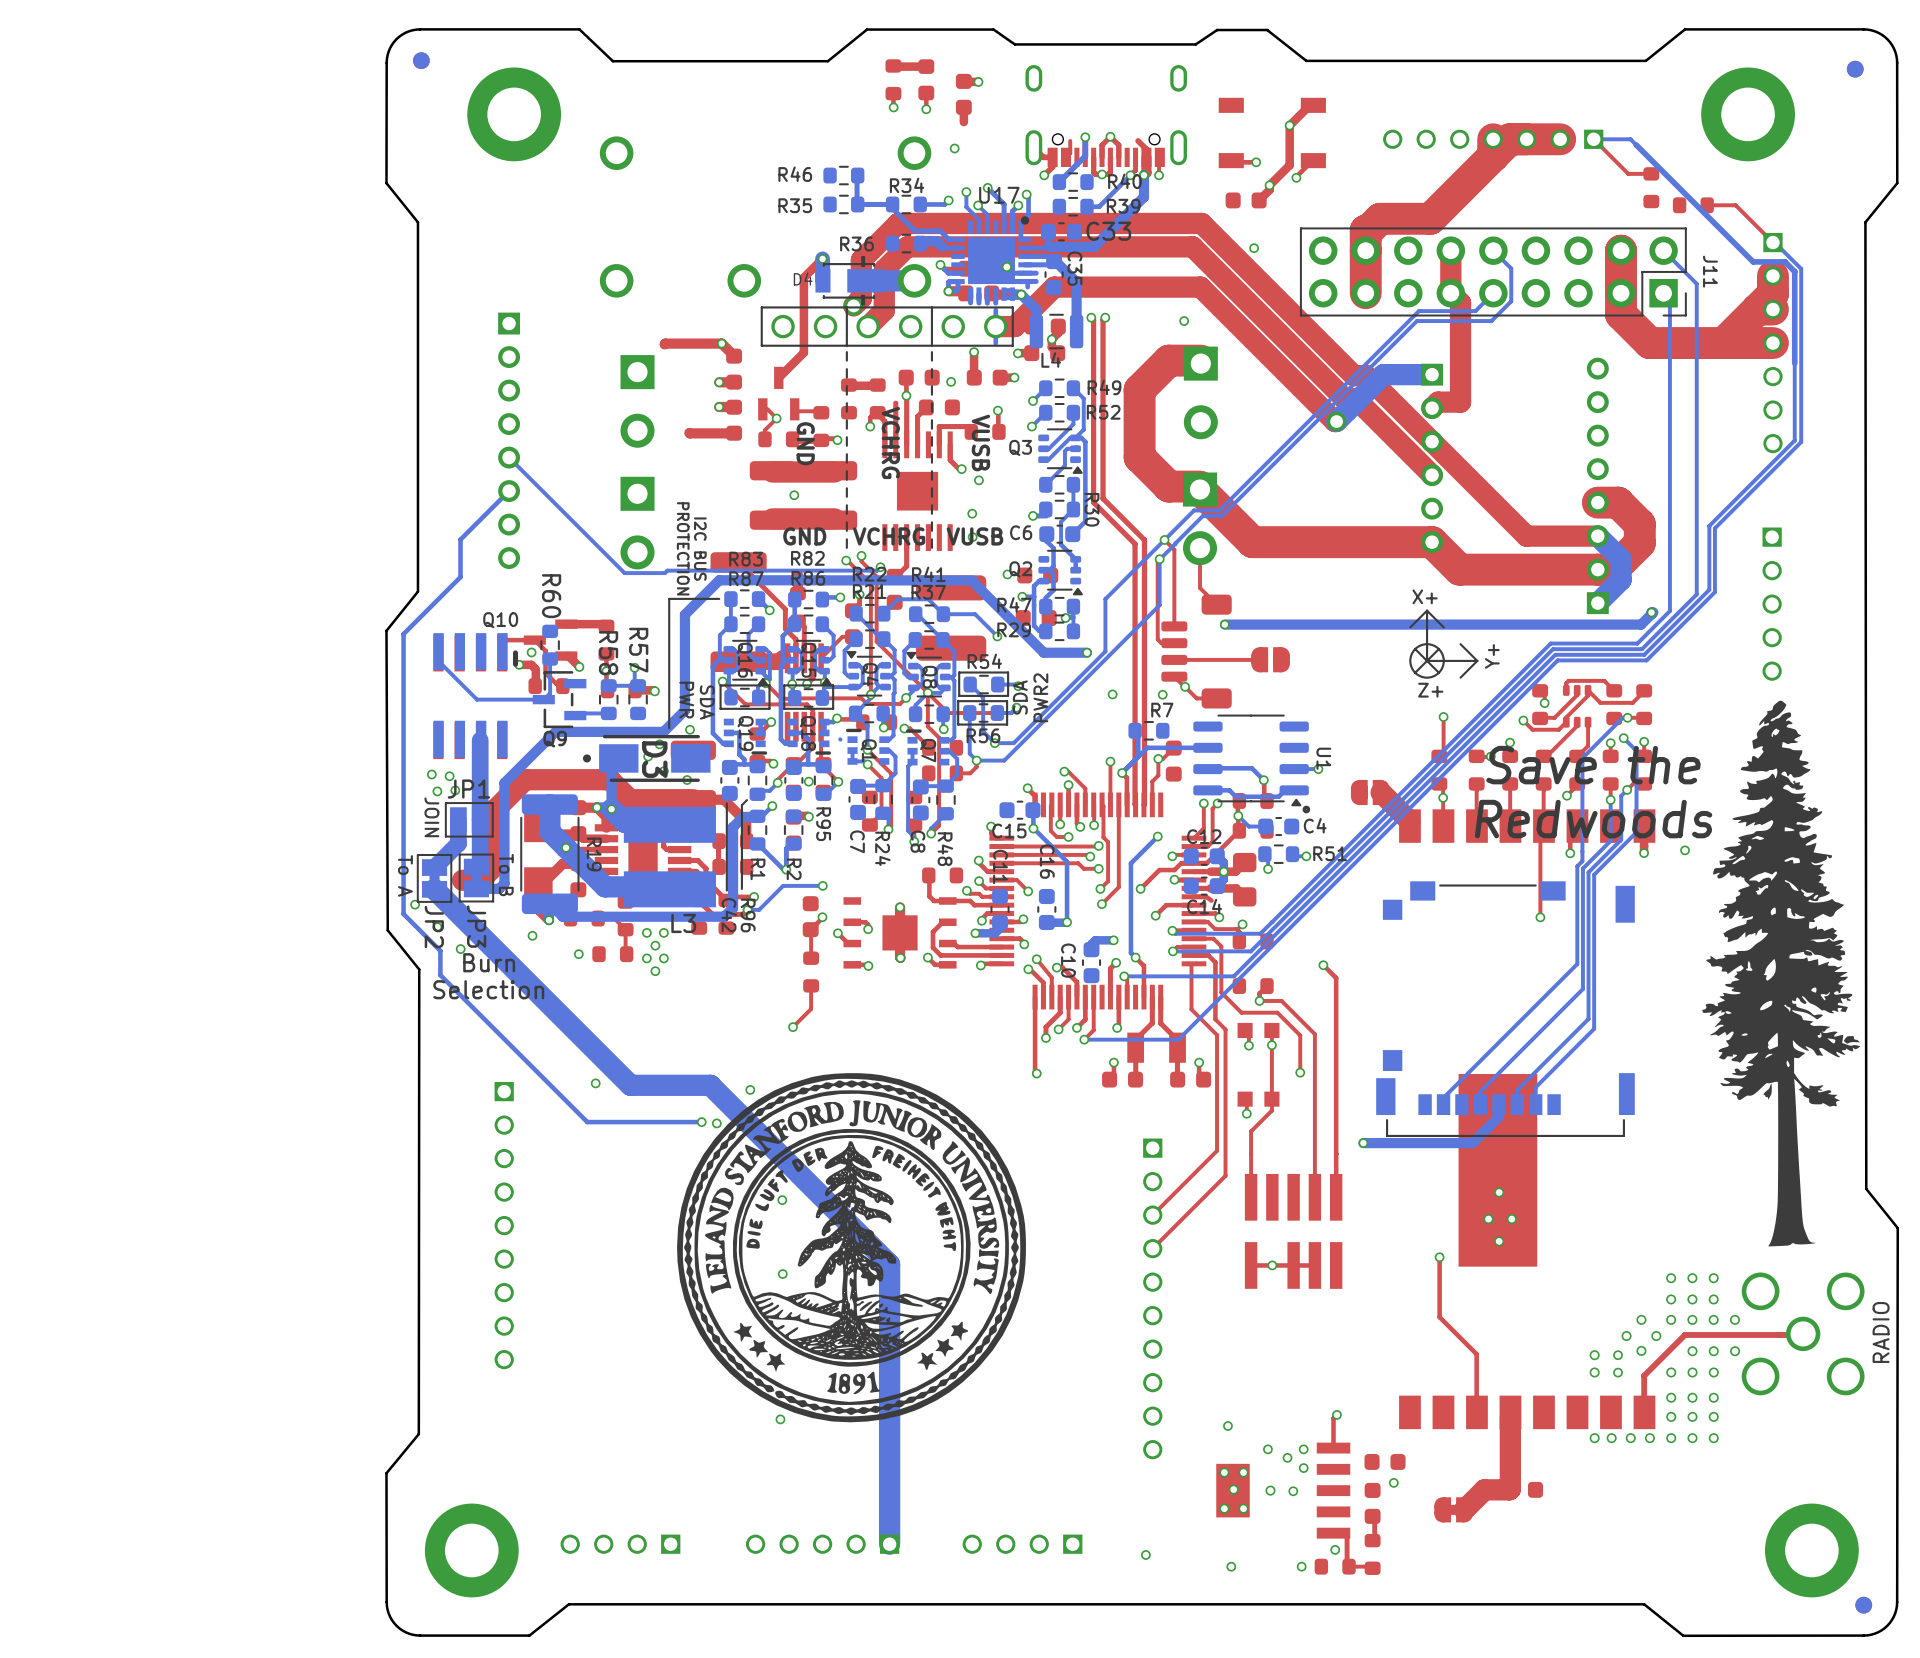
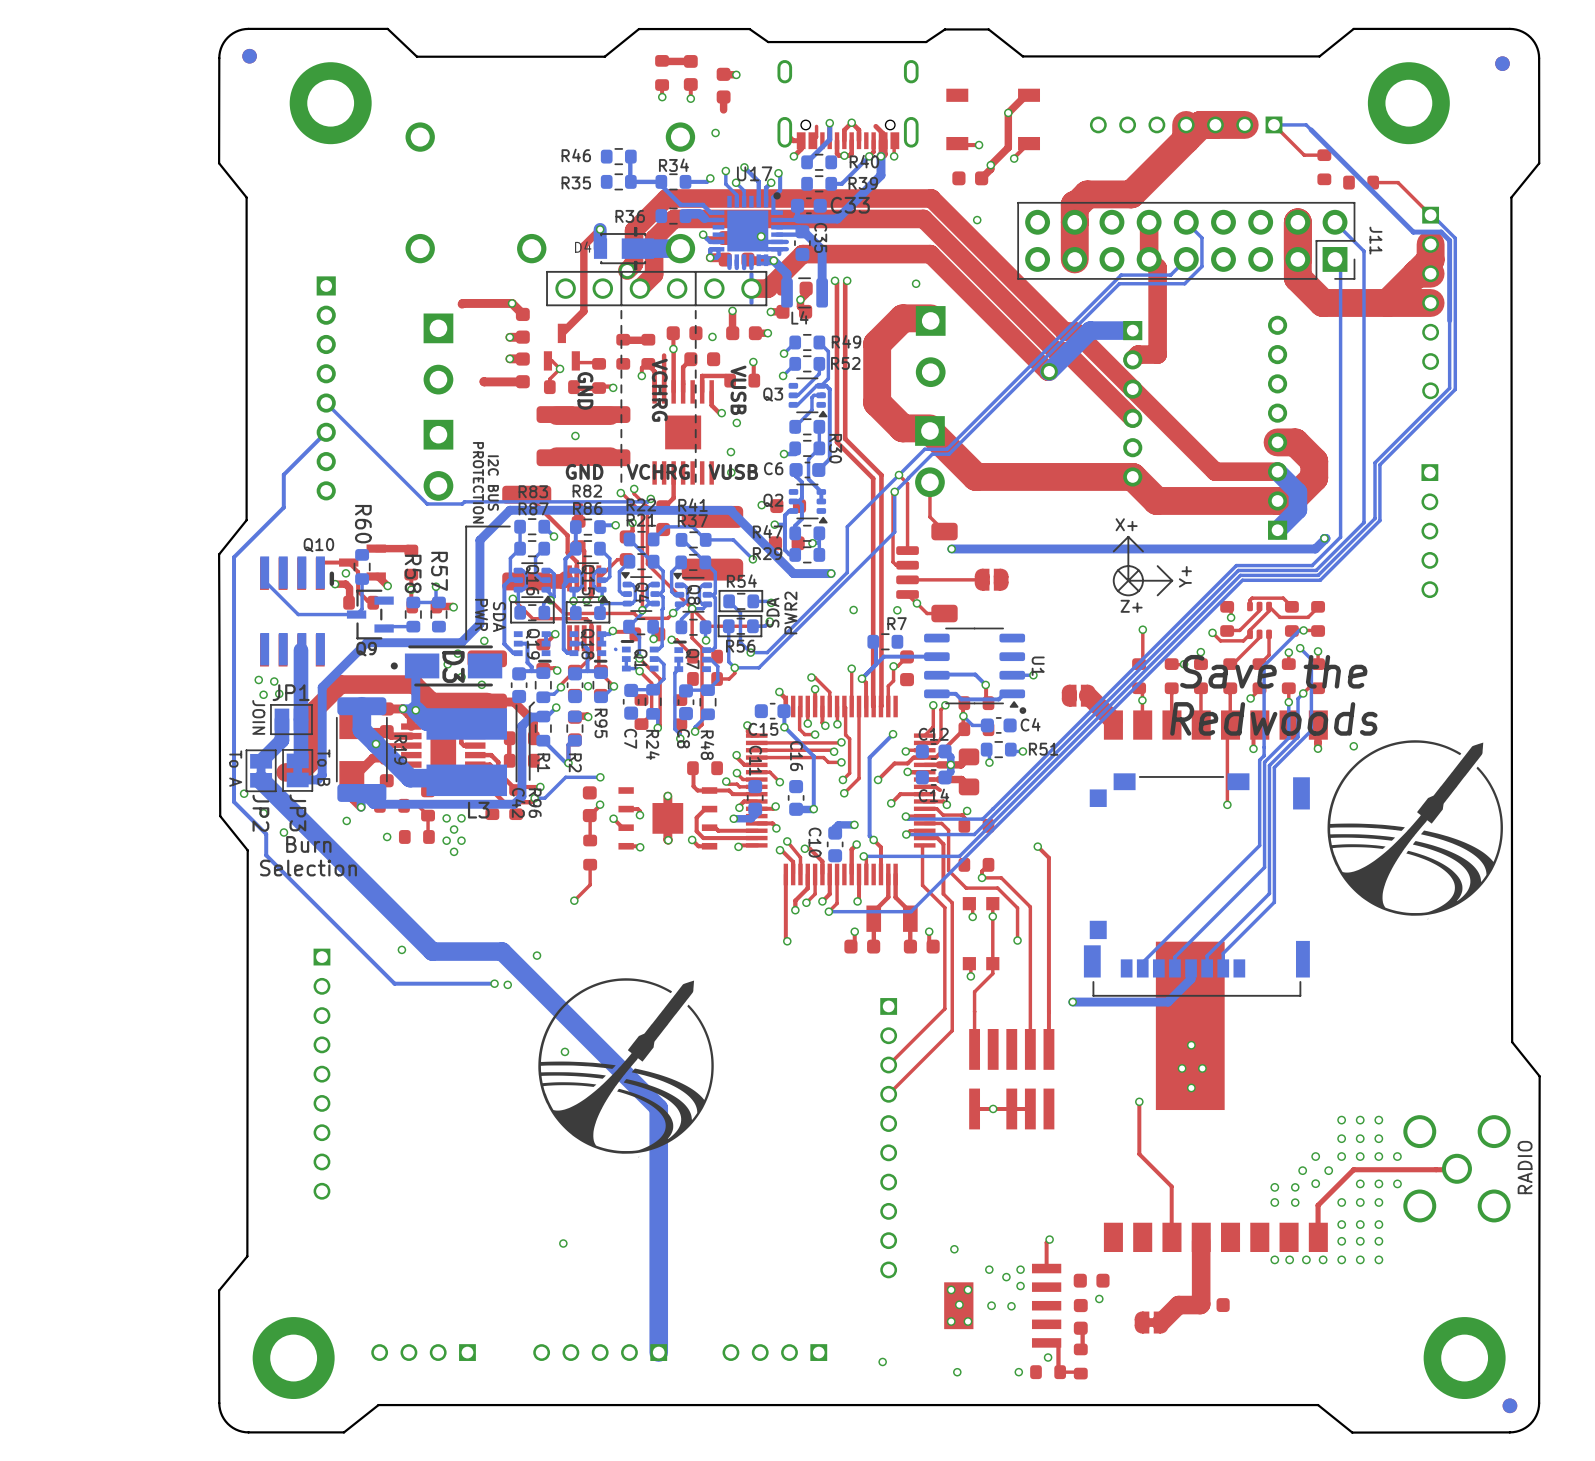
drawing: [1702, 700, 1861, 1247] -> none
drawing: none -> [1327, 740, 1503, 920]
drawing: [677, 1073, 1026, 1423] -> none
drawing: none -> [538, 978, 714, 1158]

